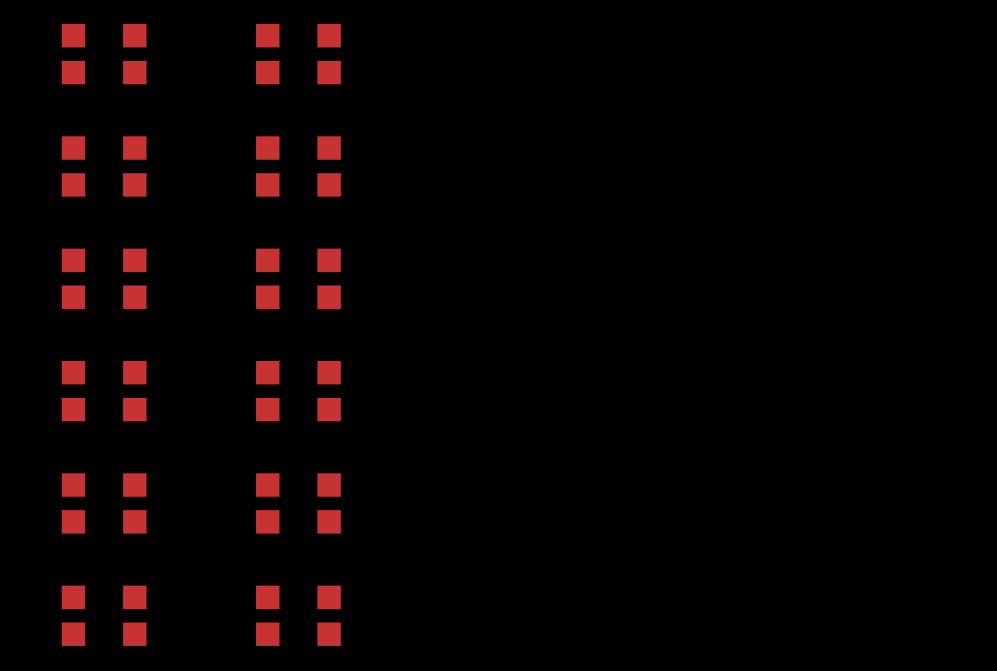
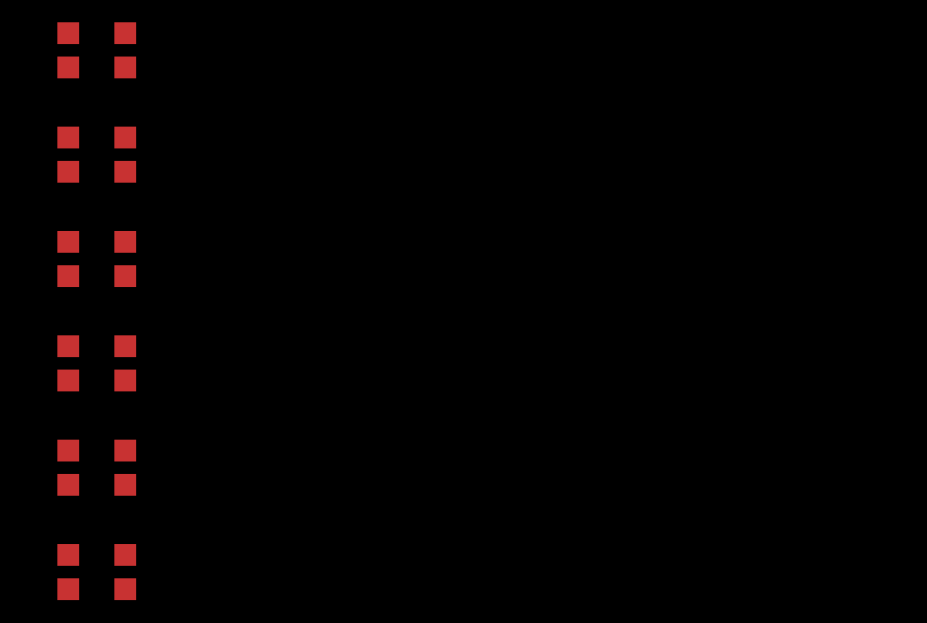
part: (298, 54) -> none
part: (298, 166) -> none
part: (298, 278) -> none
part: (298, 391) -> none
part: (298, 503) -> none
part: (298, 615) -> none

